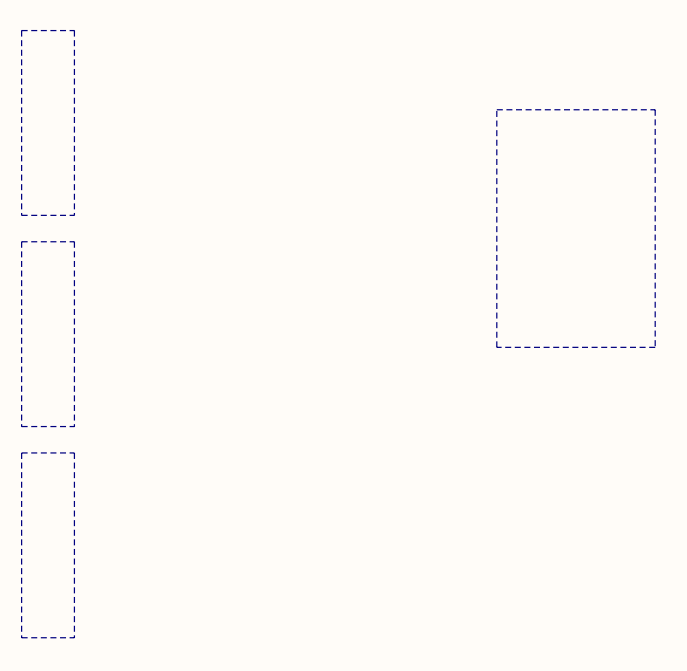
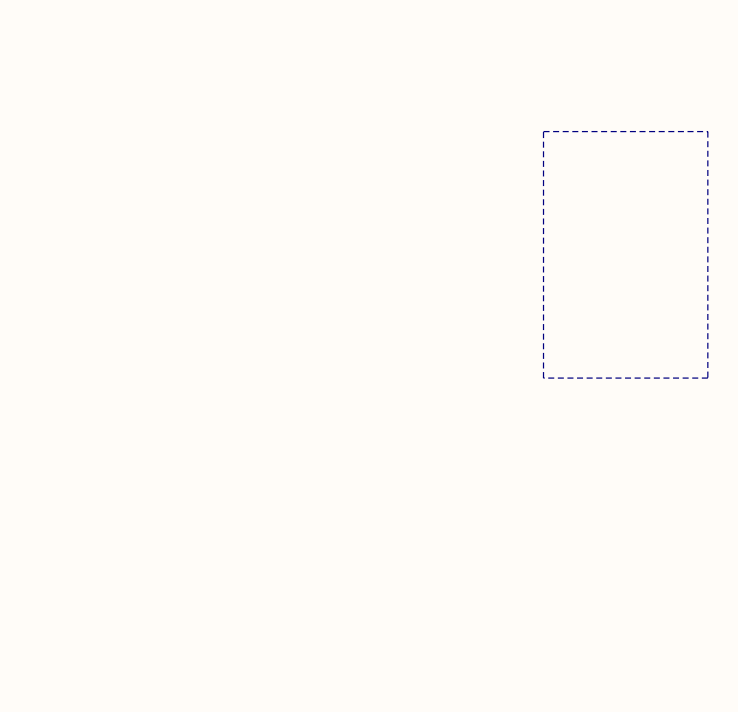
line: (21, 30) (74, 30) (74, 215) (21, 215) (21, 30) -> none
line: (21, 241) (21, 426) (74, 426) (74, 241) (21, 241) -> none
line: (21, 452) (21, 637) (74, 637) (74, 452) (21, 452) -> none

